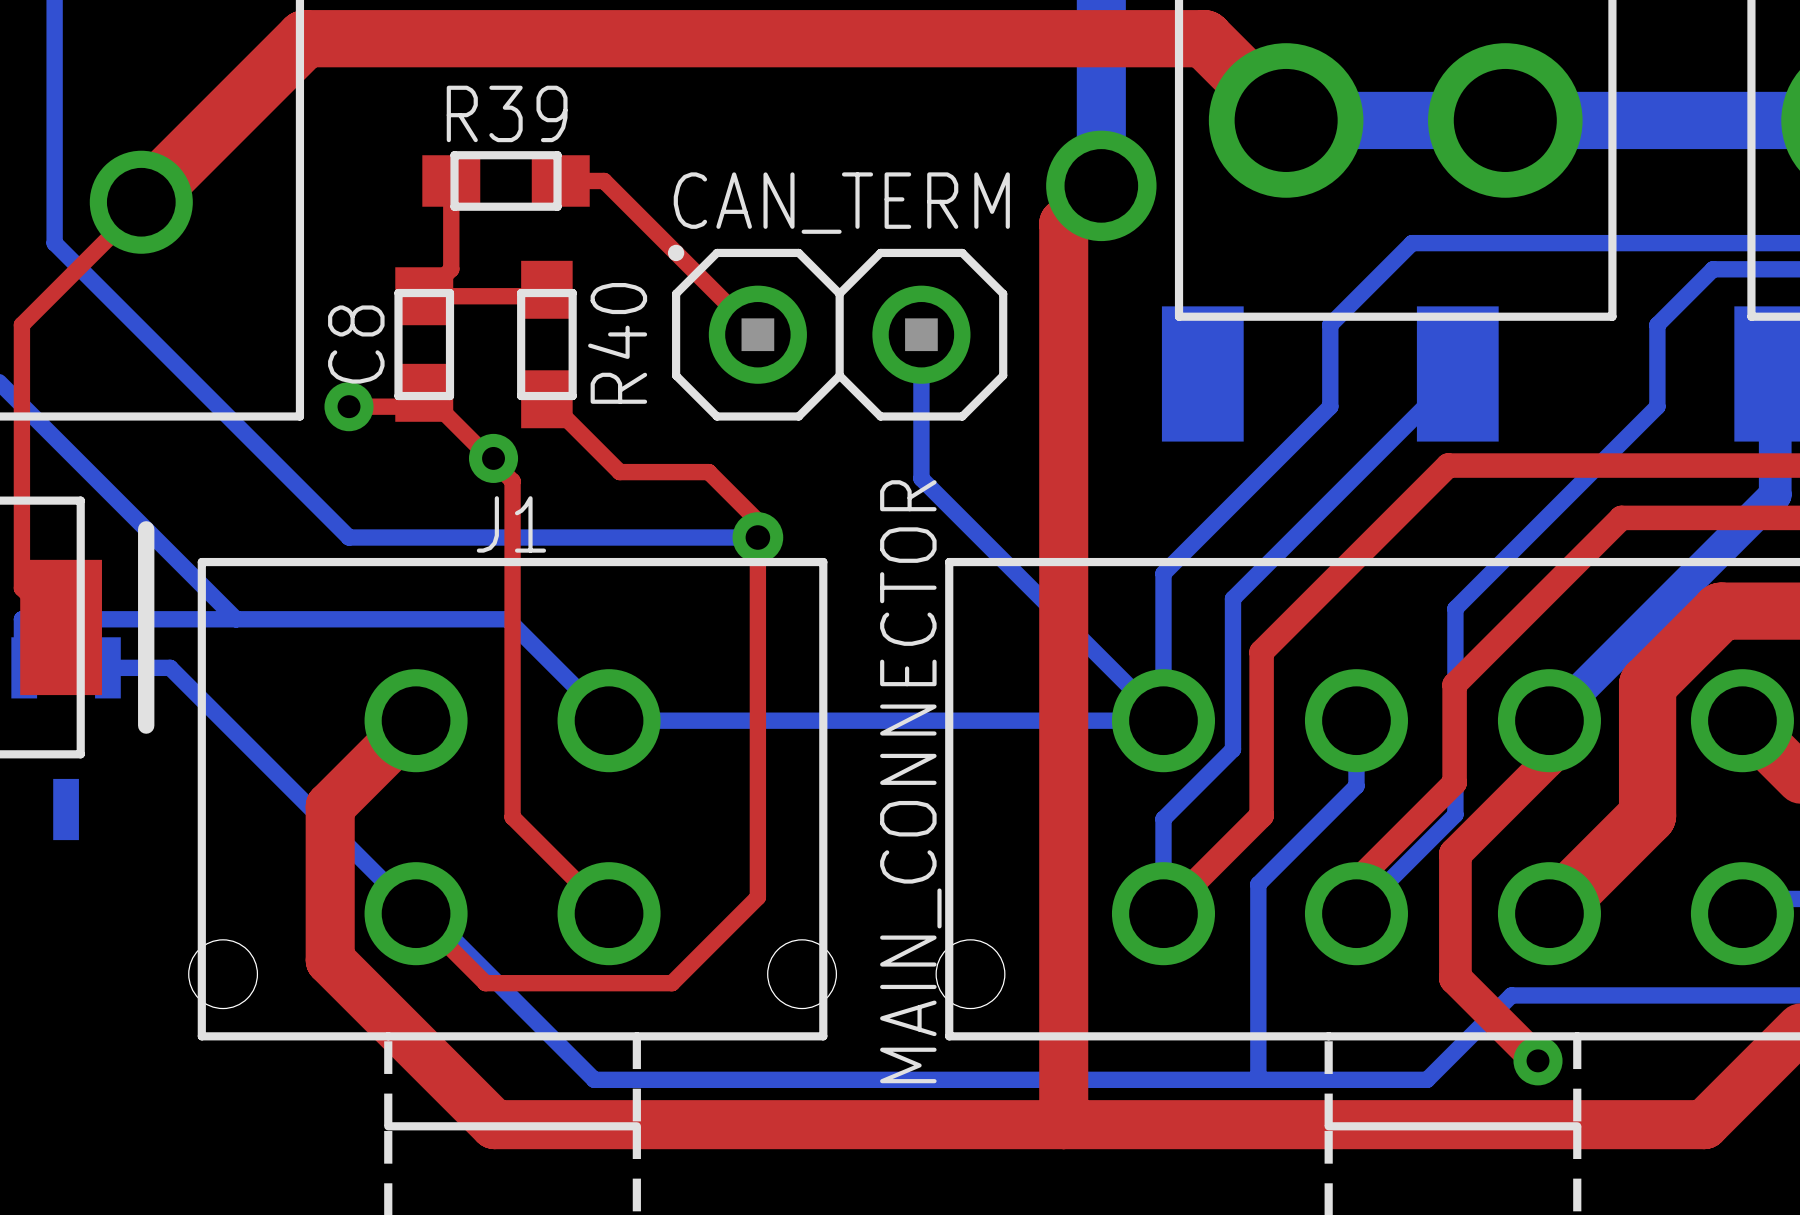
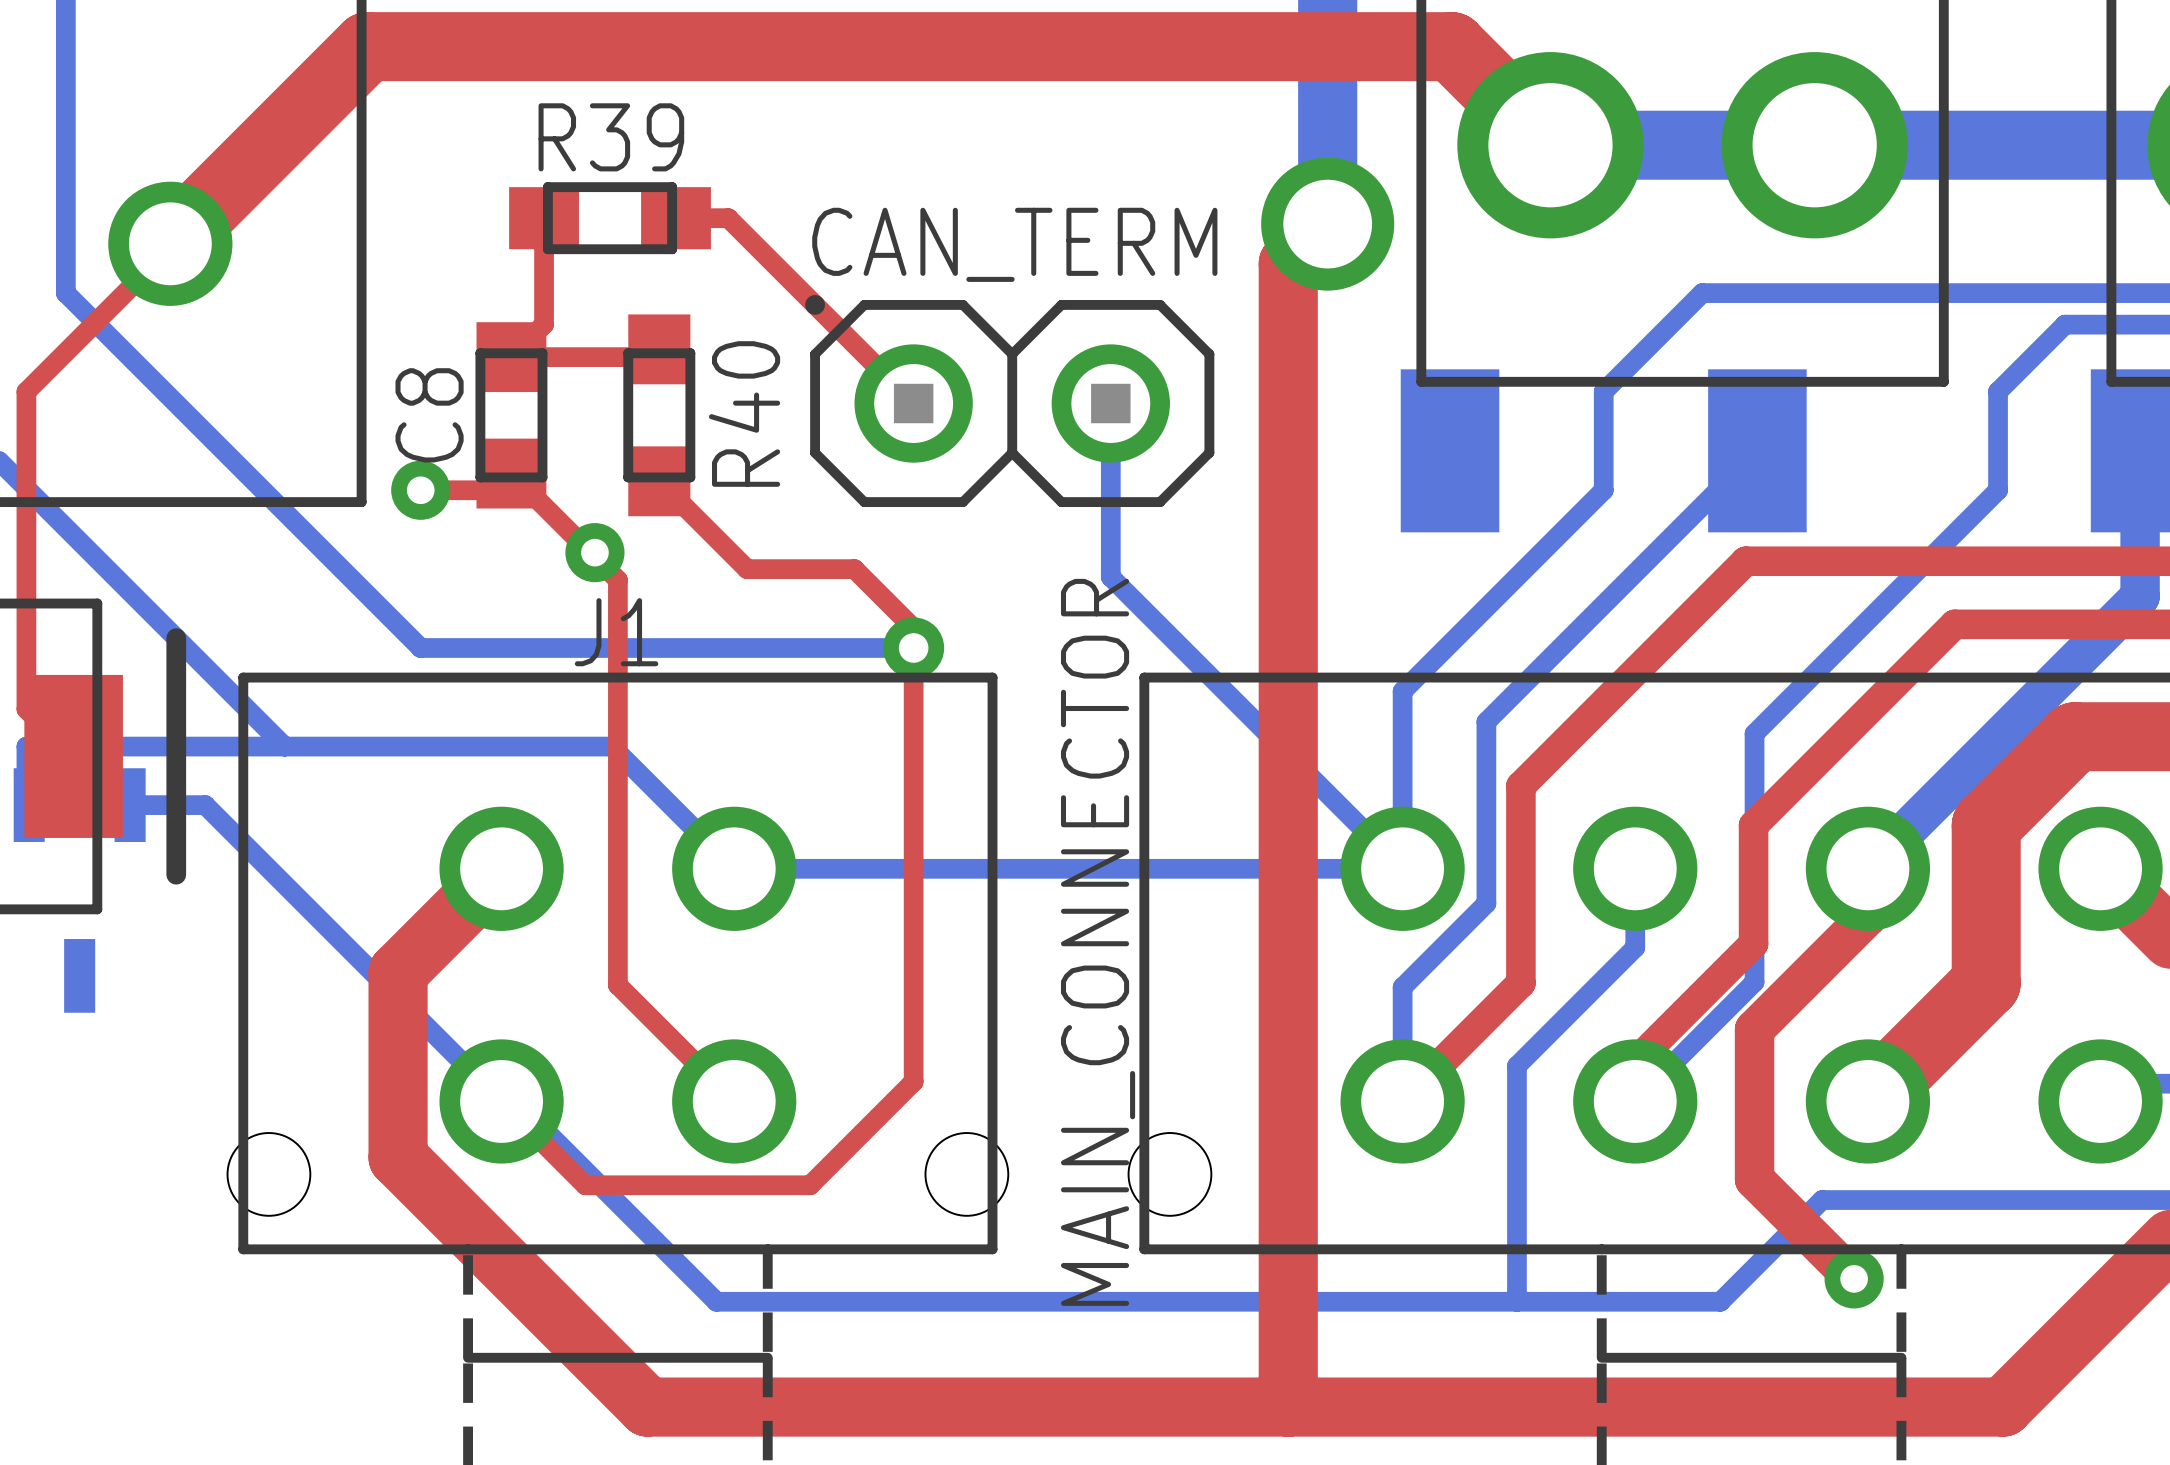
top track: (1068, 218) (1063, 223) (1063, 1124) -> (1288, 263) (1288, 1407)
top track: (494, 1124) (1704, 1124) -> (596, 1355) (647, 1407) (2003, 1407) (2054, 1355)

